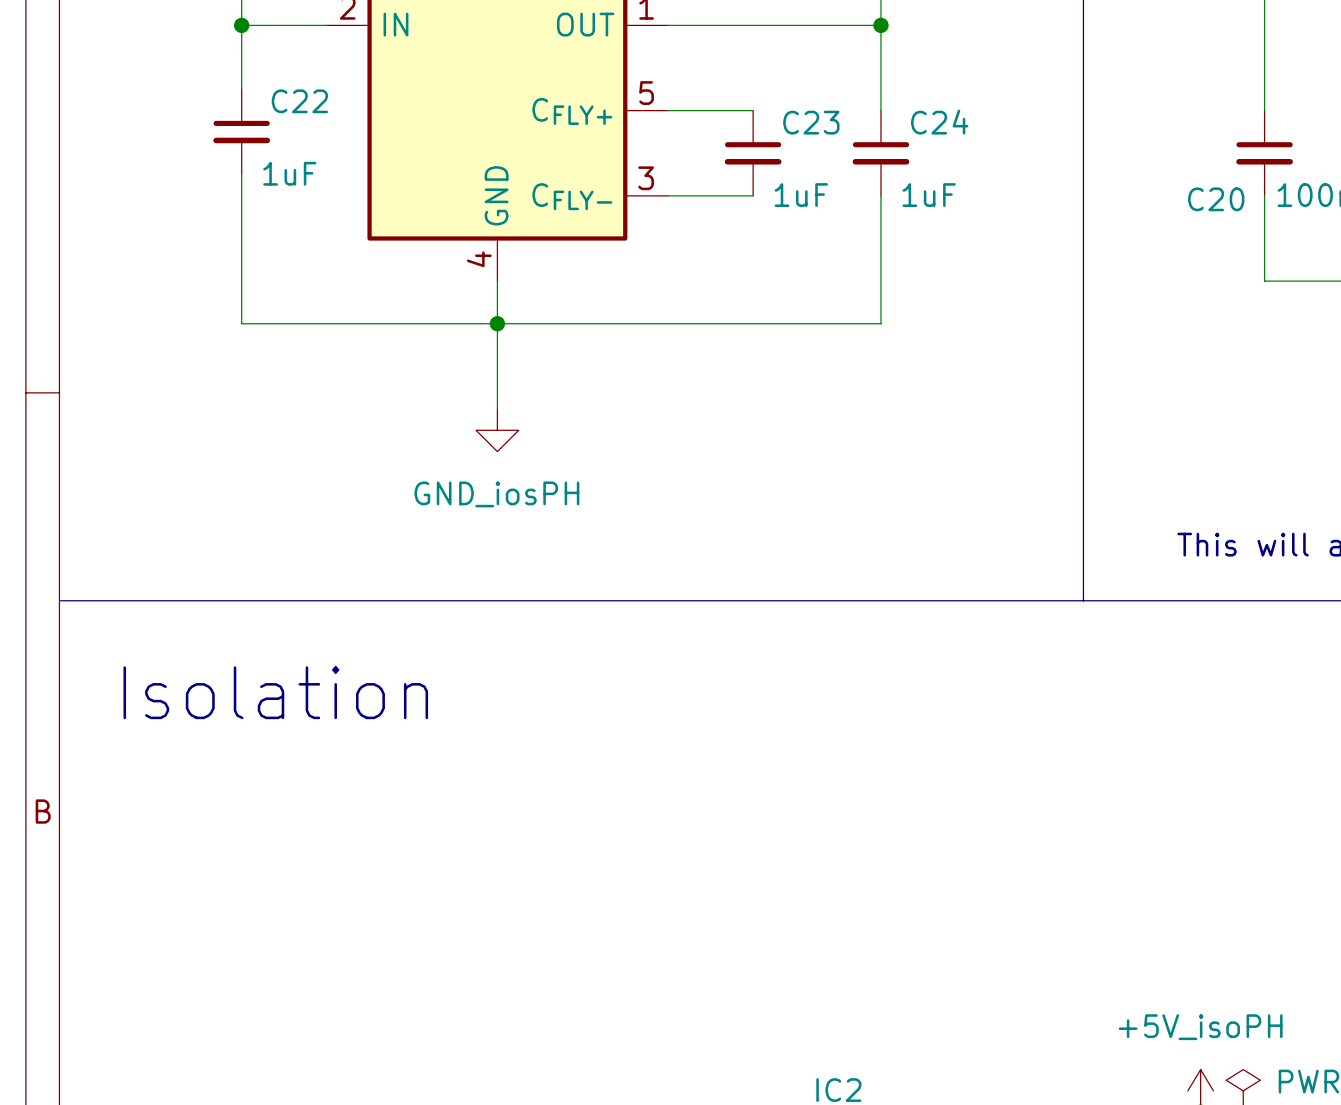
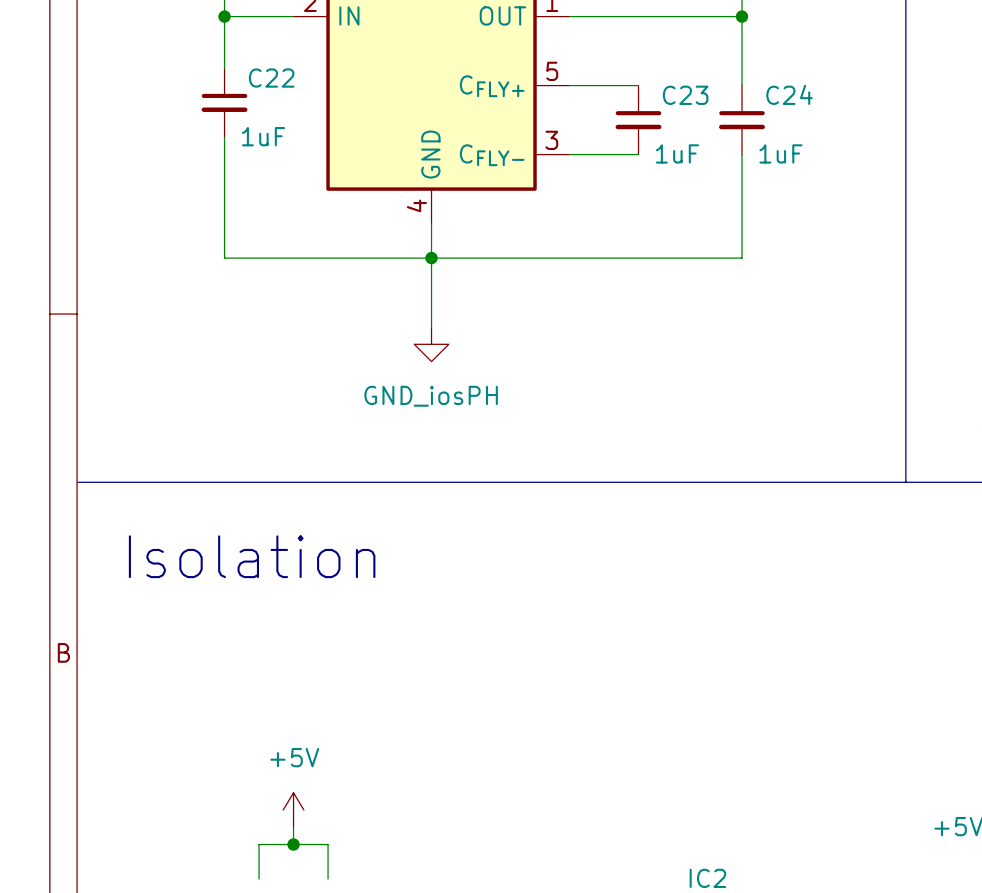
power symbol: none -> +5V (293, 810)
wire: none -> (293, 827) (293, 844)
junction: none -> (293, 844)
wire: none -> (259, 879) (259, 844) (328, 844) (328, 879)

